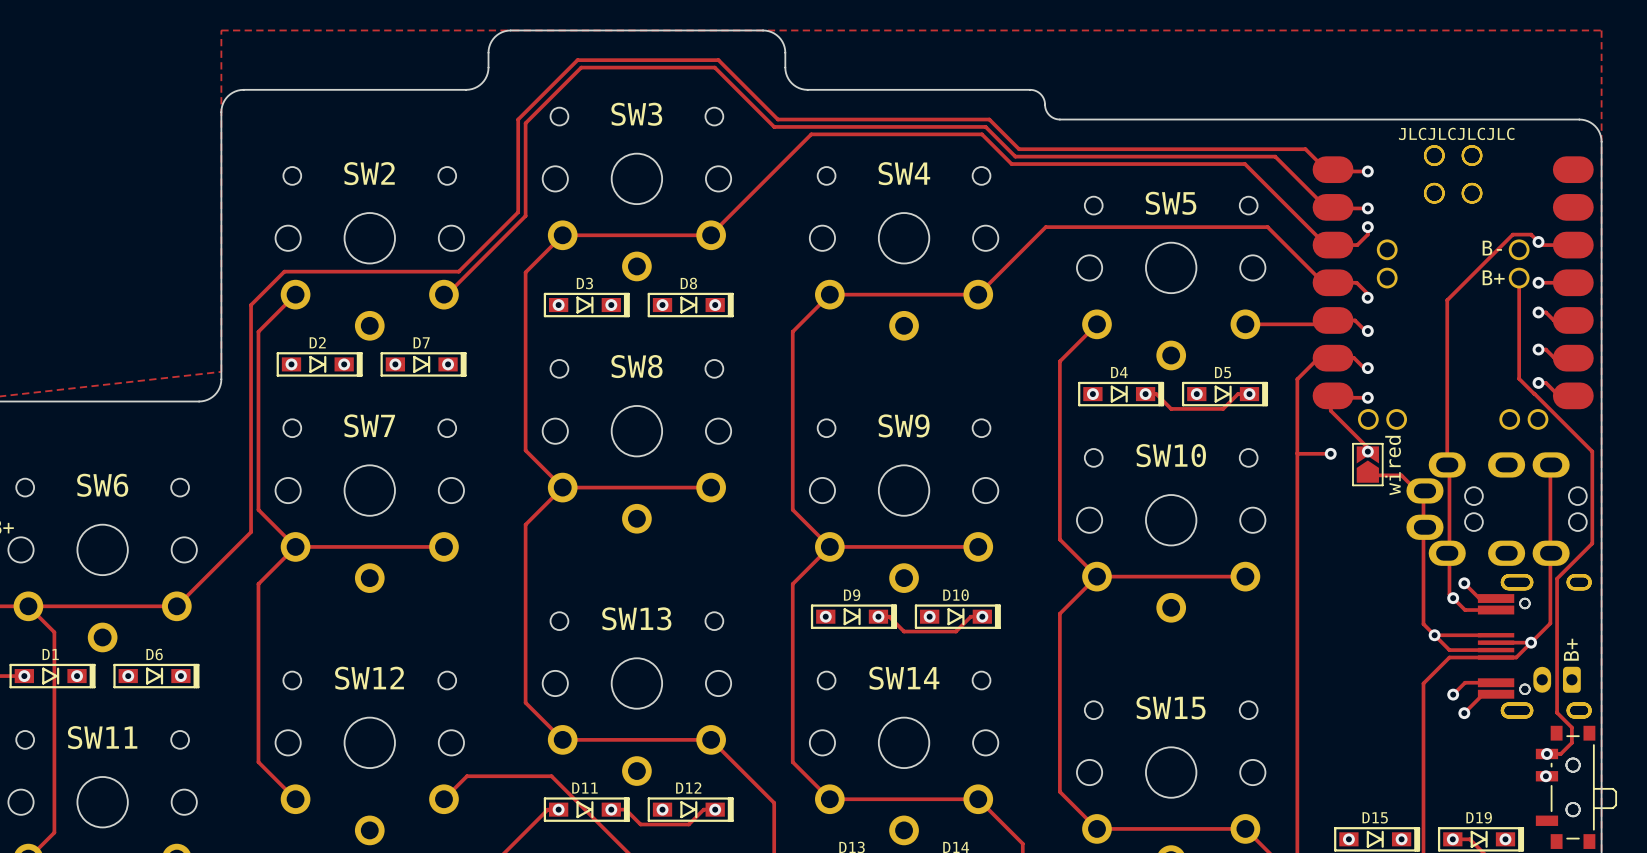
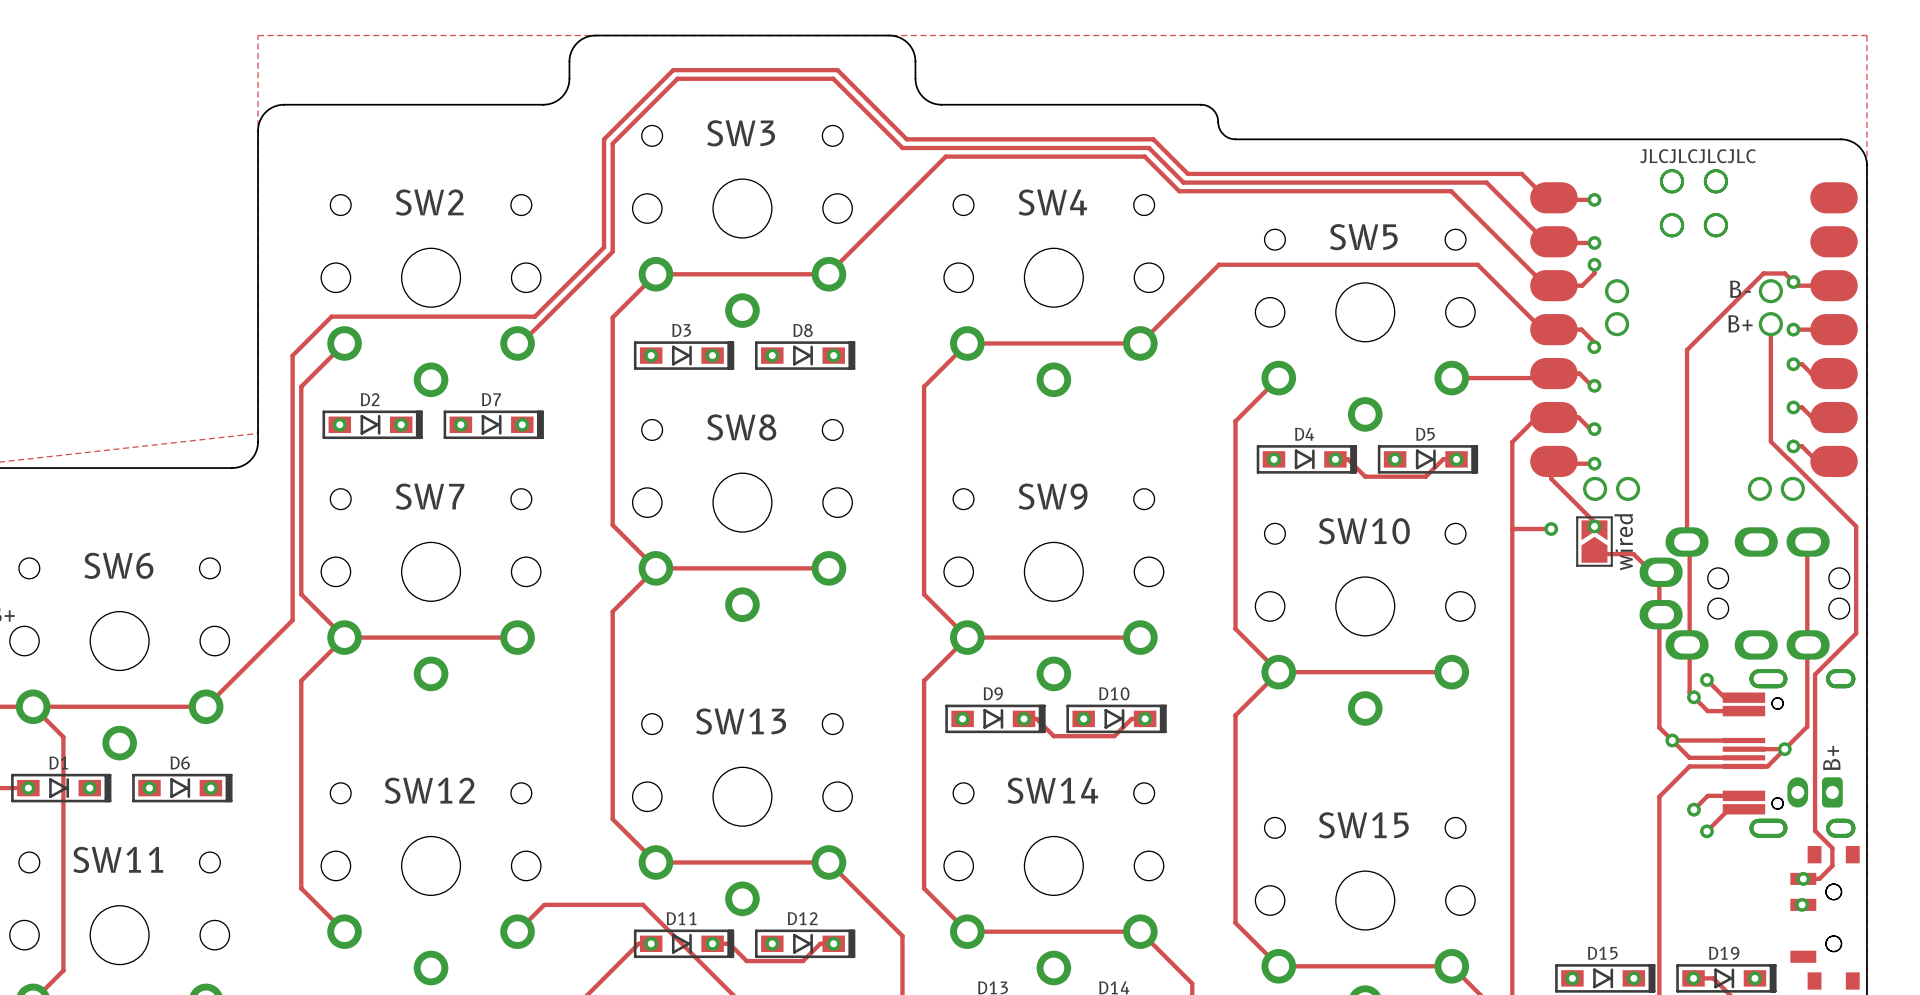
part footprint: [1535, 725, 1618, 849] -> [1790, 846, 1860, 990]

